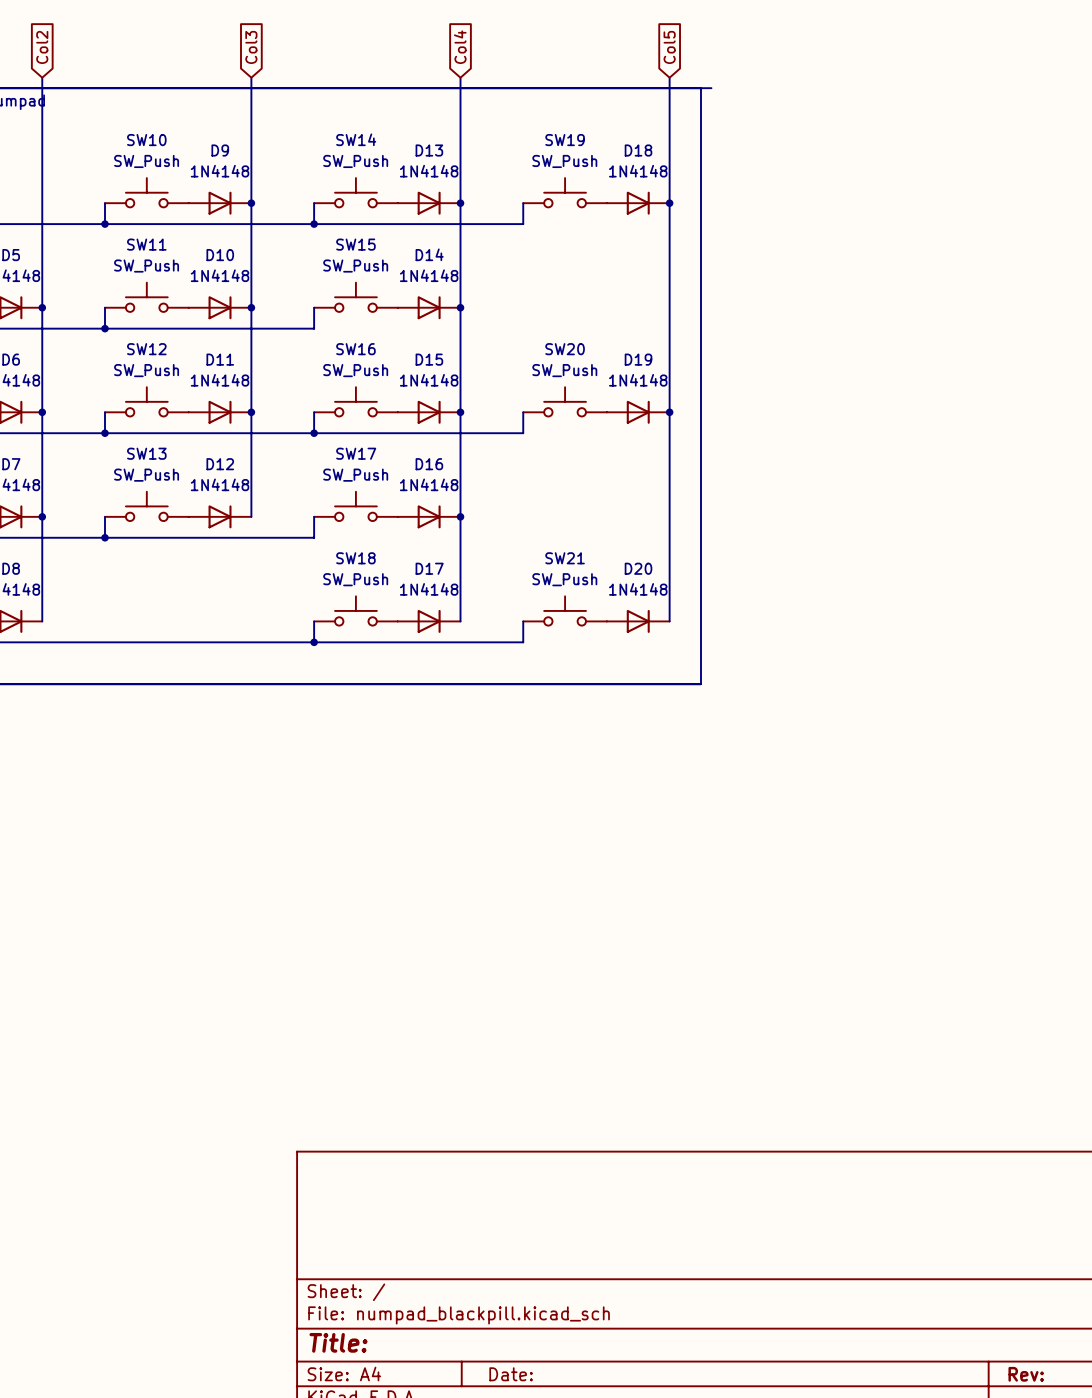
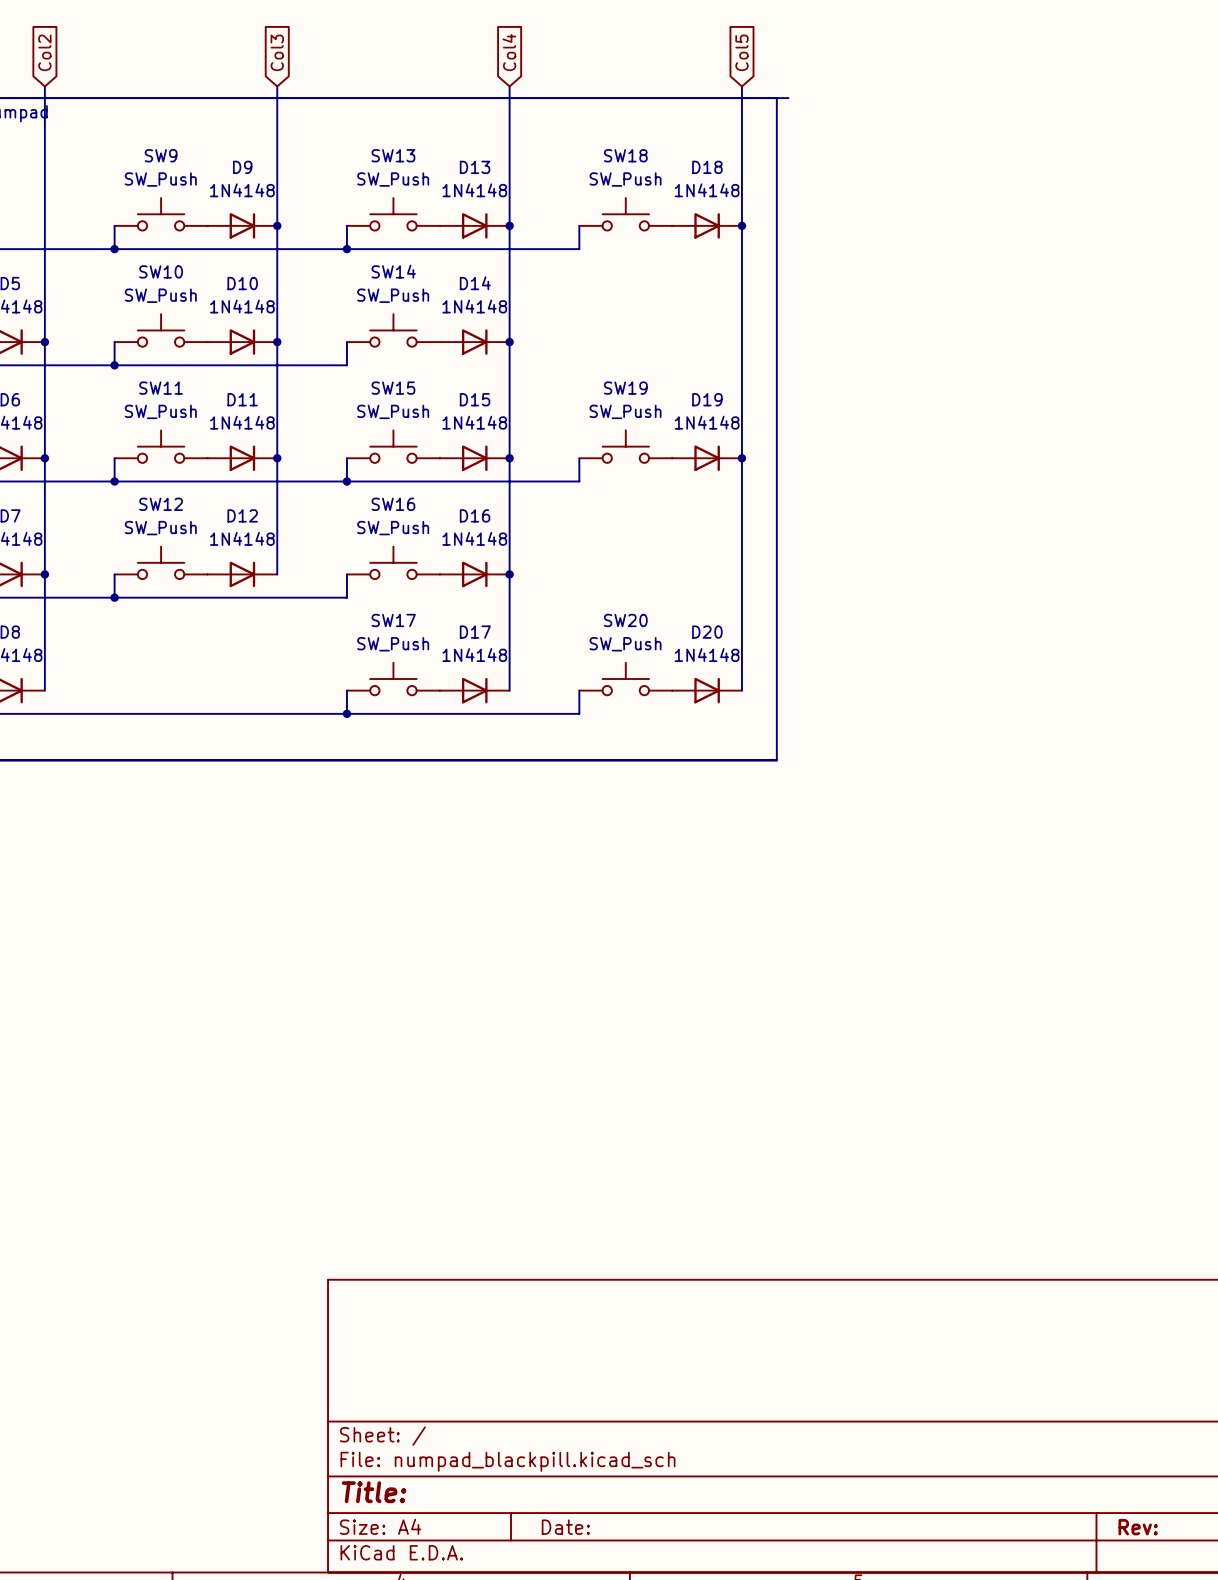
SW14 name: SW14 (356, 139) -> SW13 (393, 155)
SW10 name: SW10 (146, 140) -> SW9 (161, 155)
SW19 name: SW19 (565, 140) -> SW18 (625, 155)
SW11 name: SW11 (146, 244) -> SW10 (161, 271)
SW15 name: SW15 (355, 244) -> SW14 (393, 271)
SW12 name: SW12 (146, 349) -> SW11 (161, 388)
SW16 name: SW16 (355, 349) -> SW15 (393, 388)
SW20 name: SW20 (565, 349) -> SW19 (625, 388)
SW13 name: SW13 (146, 453) -> SW12 (161, 504)
SW17 name: SW17 (356, 453) -> SW16 (393, 504)
SW18 name: SW18 (355, 558) -> SW17 (393, 620)
SW21 name: SW21 (565, 558) -> SW20 (625, 620)

